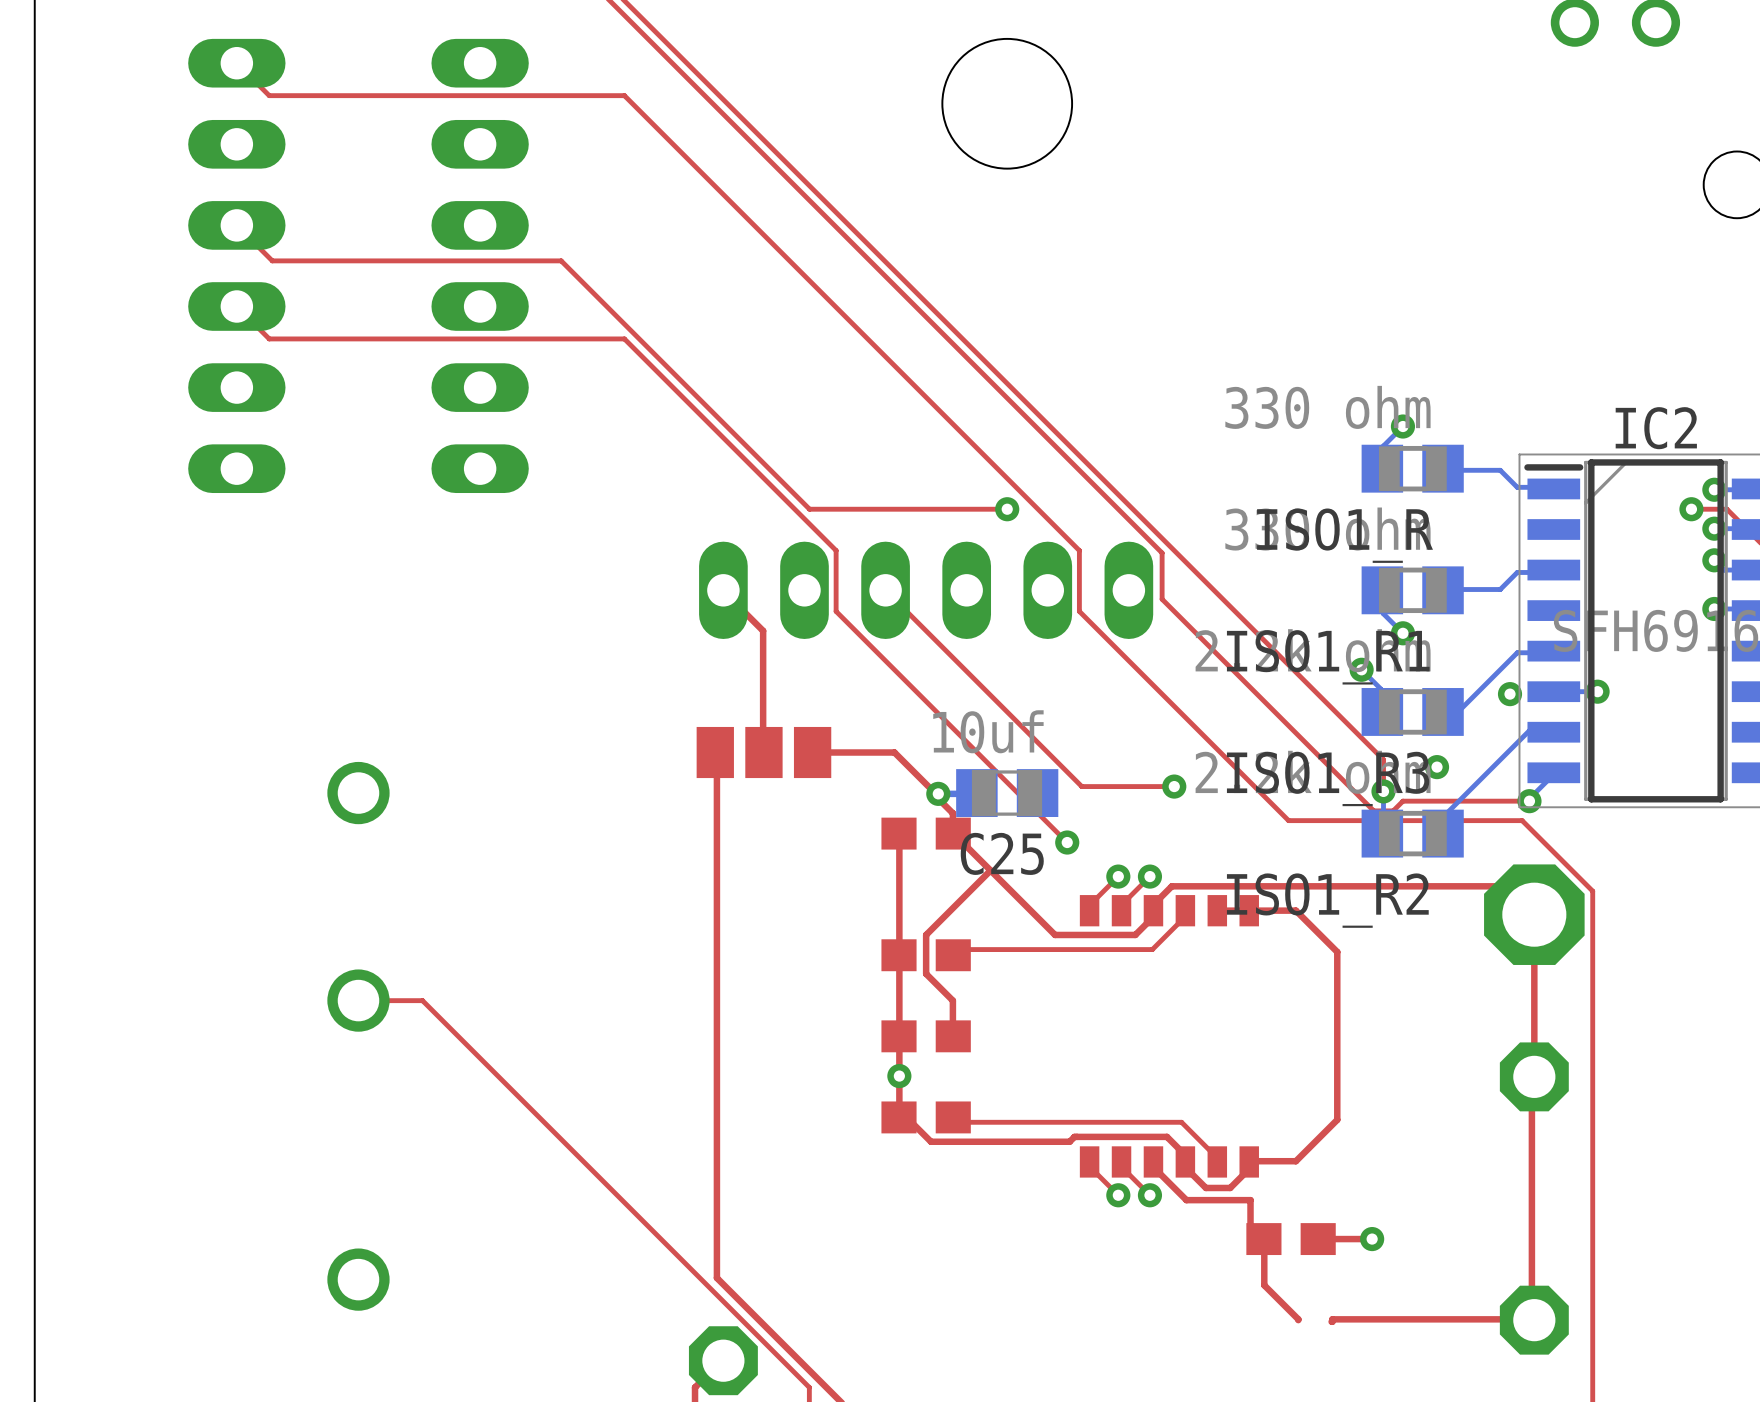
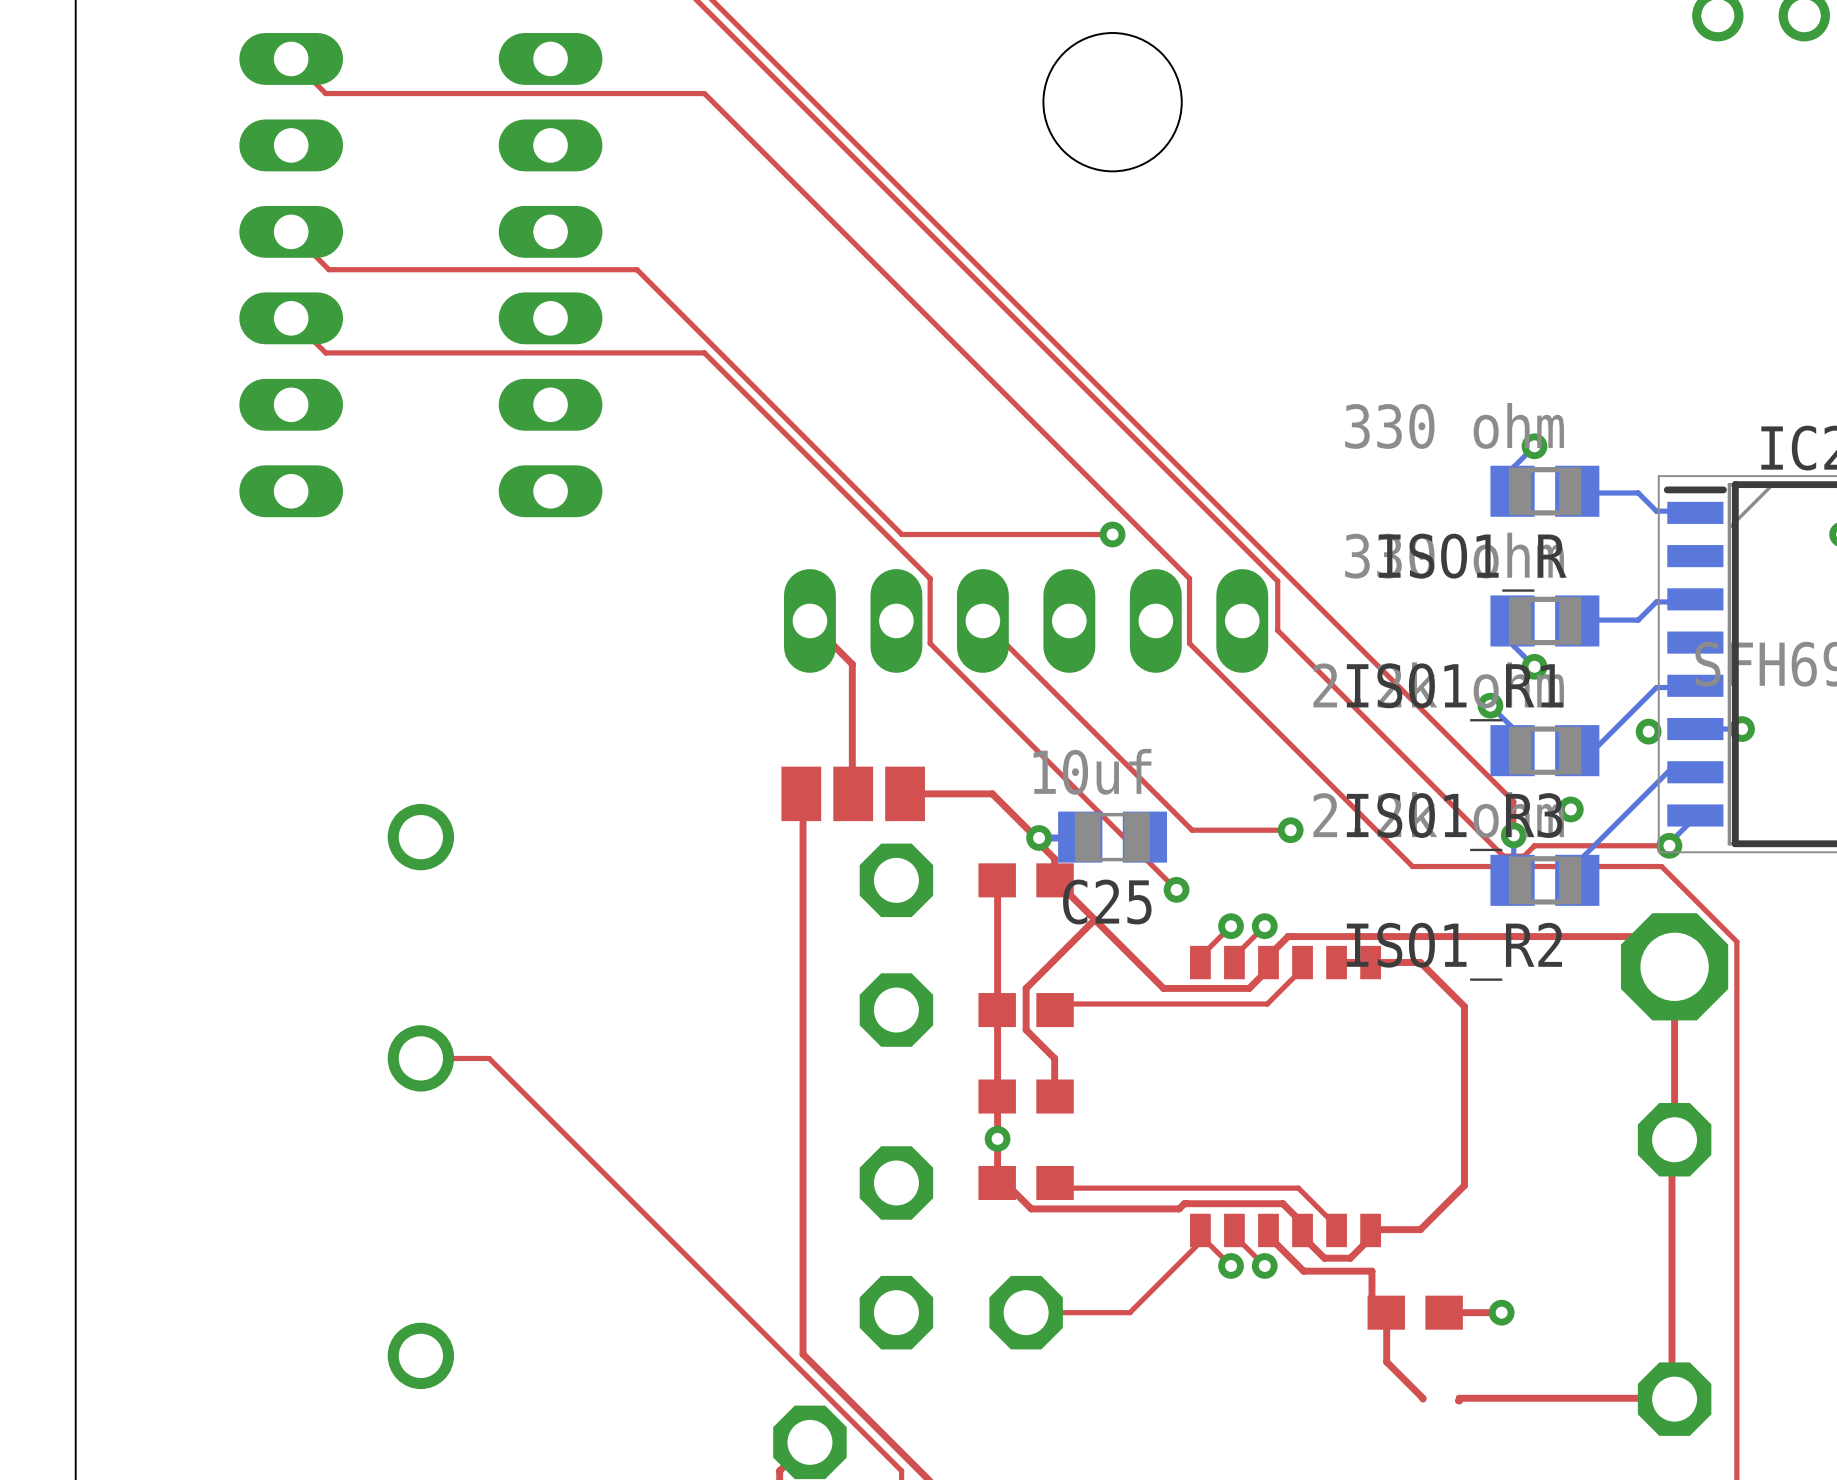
part: none -> (896, 880)
part: none -> (896, 1010)
part: none -> (896, 1182)
top track: none -> (1200, 1230) (1202, 1240) (1129, 1312) (1026, 1312)
part: none -> (896, 1312)
part: none -> (1026, 1312)

